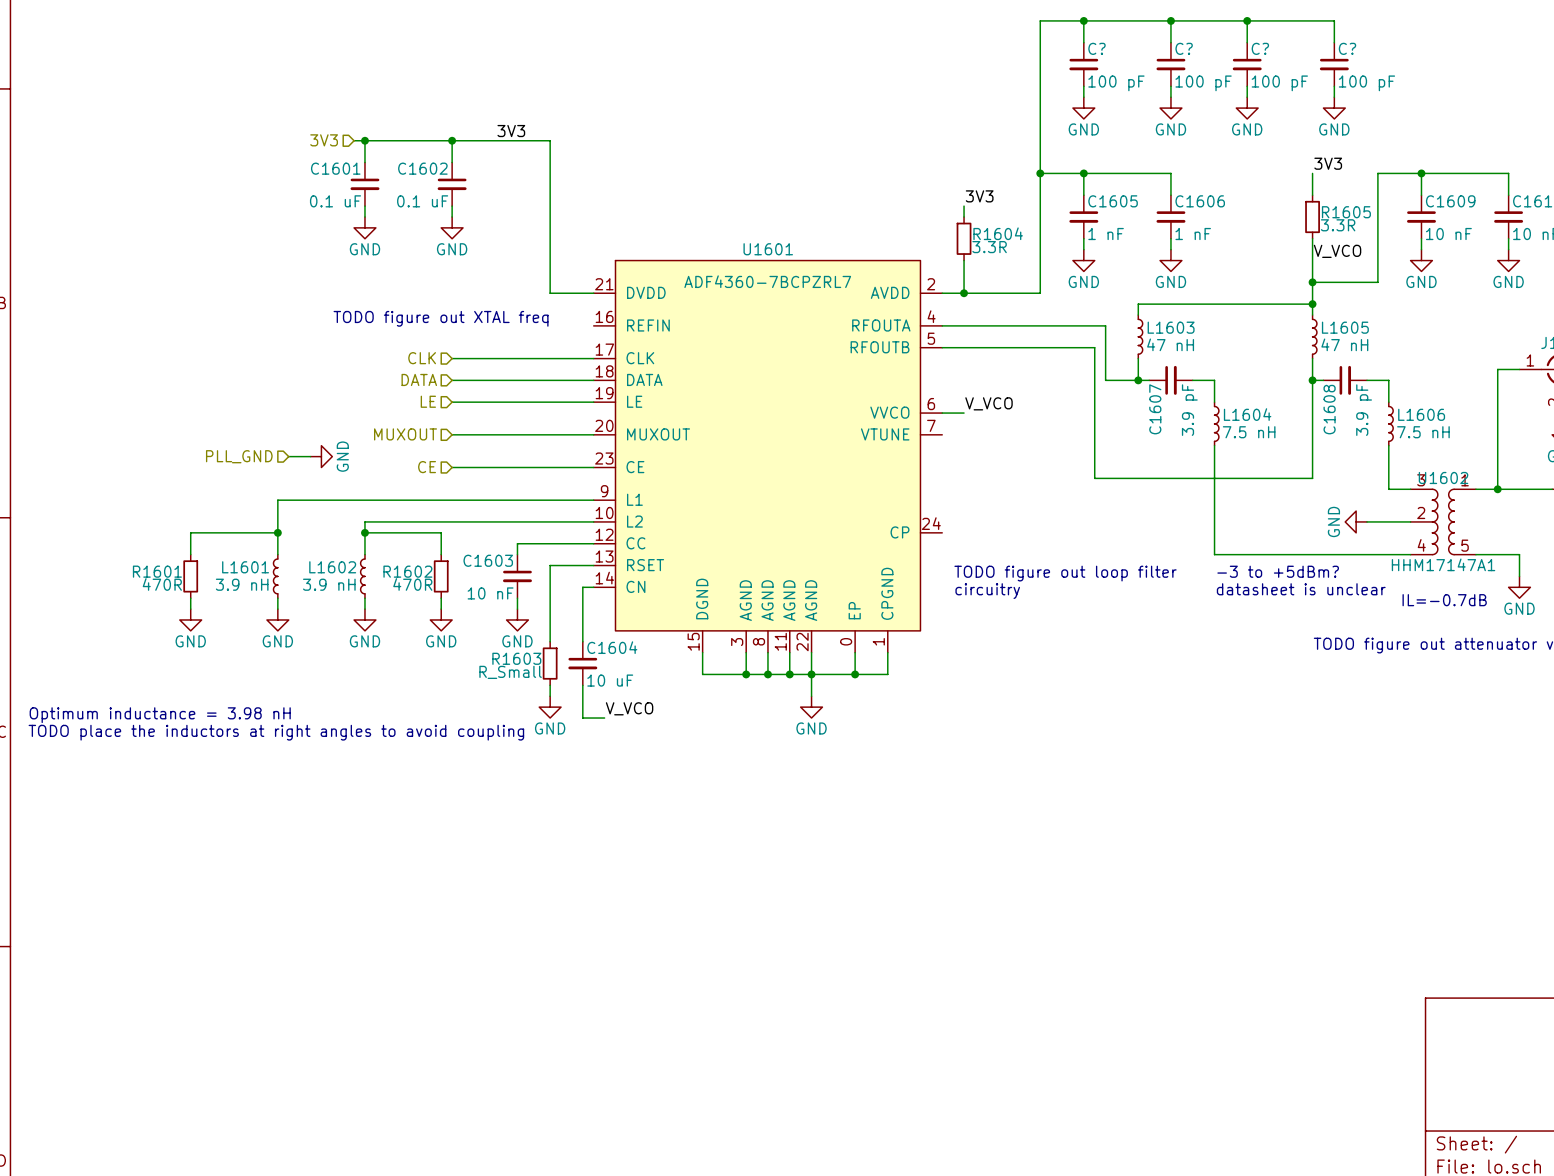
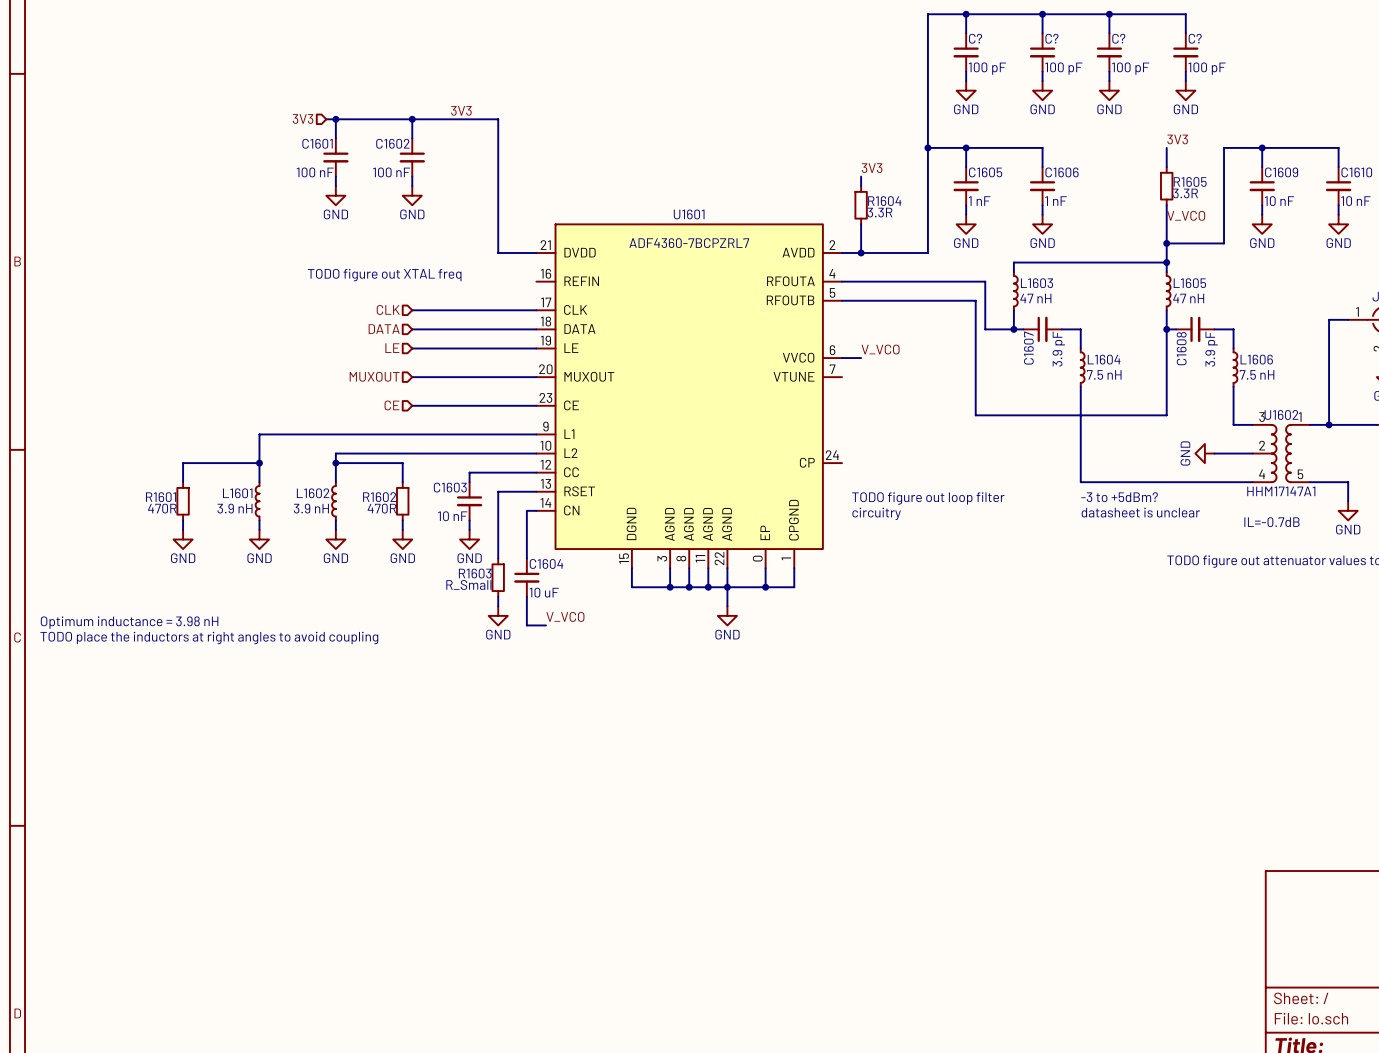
C1601 value: 0.1 uF (335, 201) -> 100 nF (315, 172)
C1602 value: 0.1 uF (422, 201) -> 100 nF (391, 172)
hierarchical label: PLL_GND (239, 456) -> none
wire: (288, 456) (310, 456) -> none
power symbol: GND (321, 456) -> none

